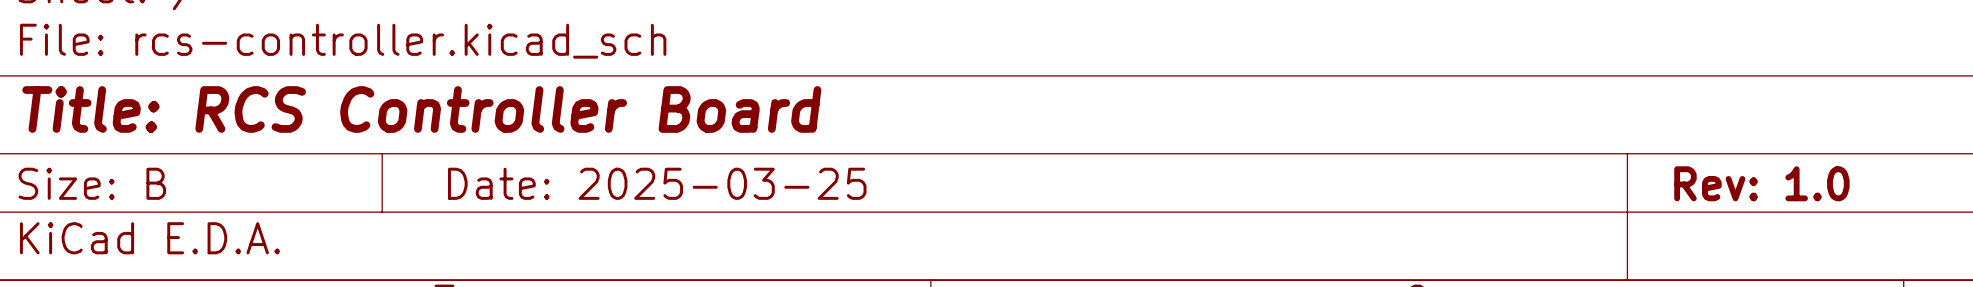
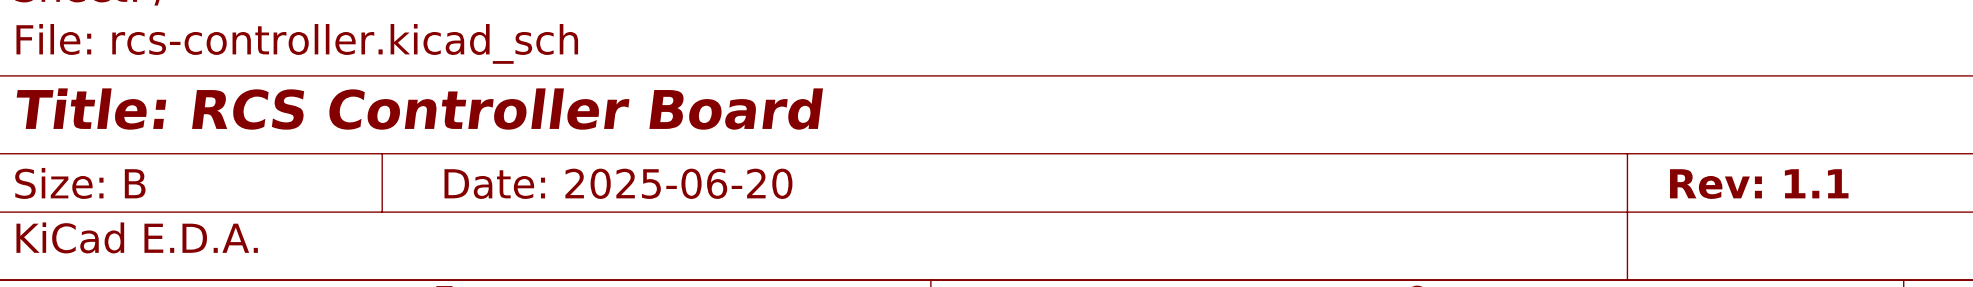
title block: Date: 2025-03-25 (657, 183) -> Date: 2025-06-20 (618, 183)
title block: Rev: 1.0 (1761, 183) -> Rev: 1.1 (1759, 184)

